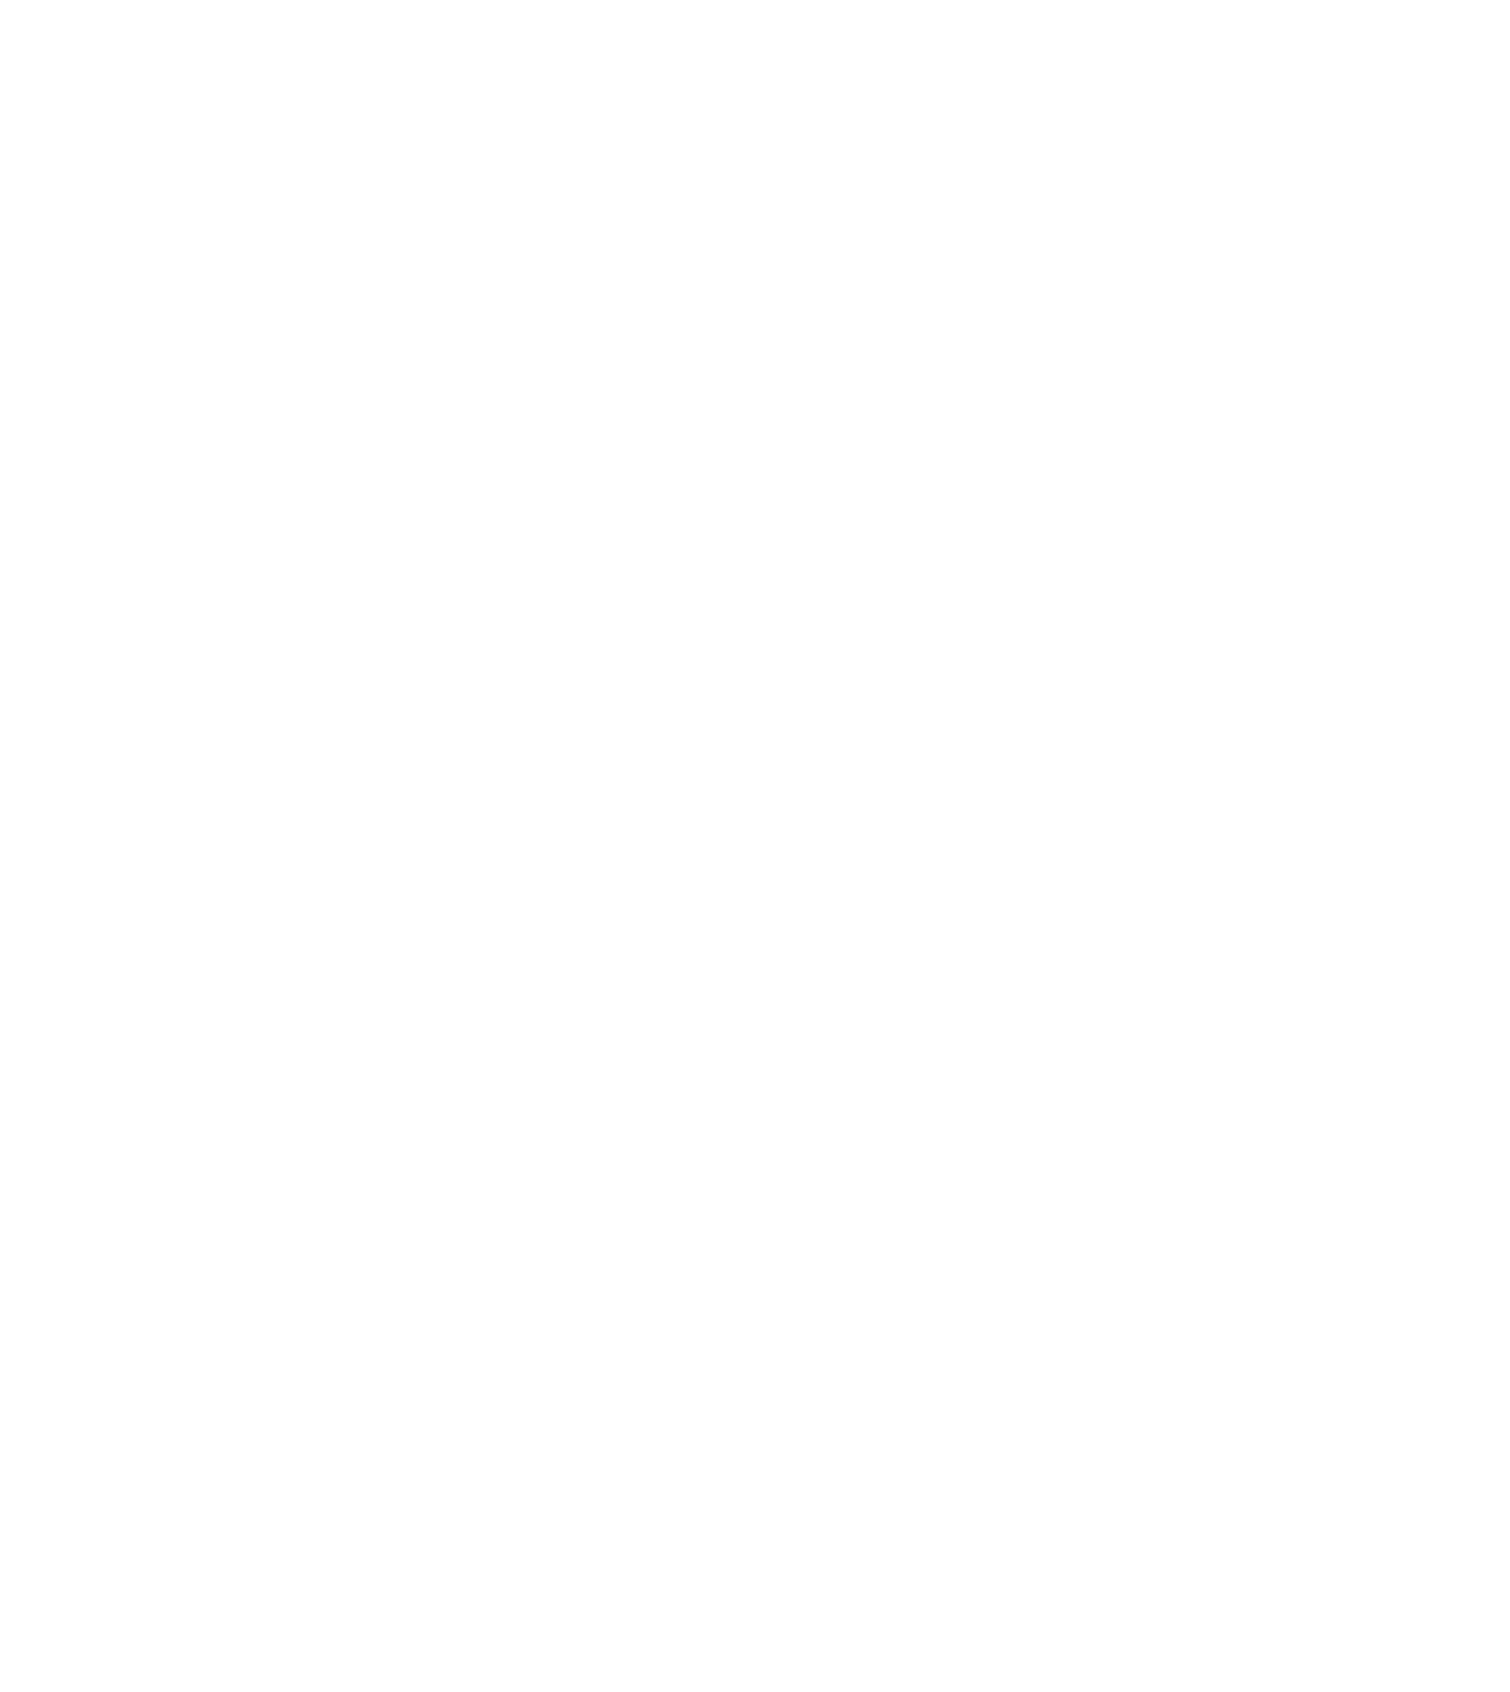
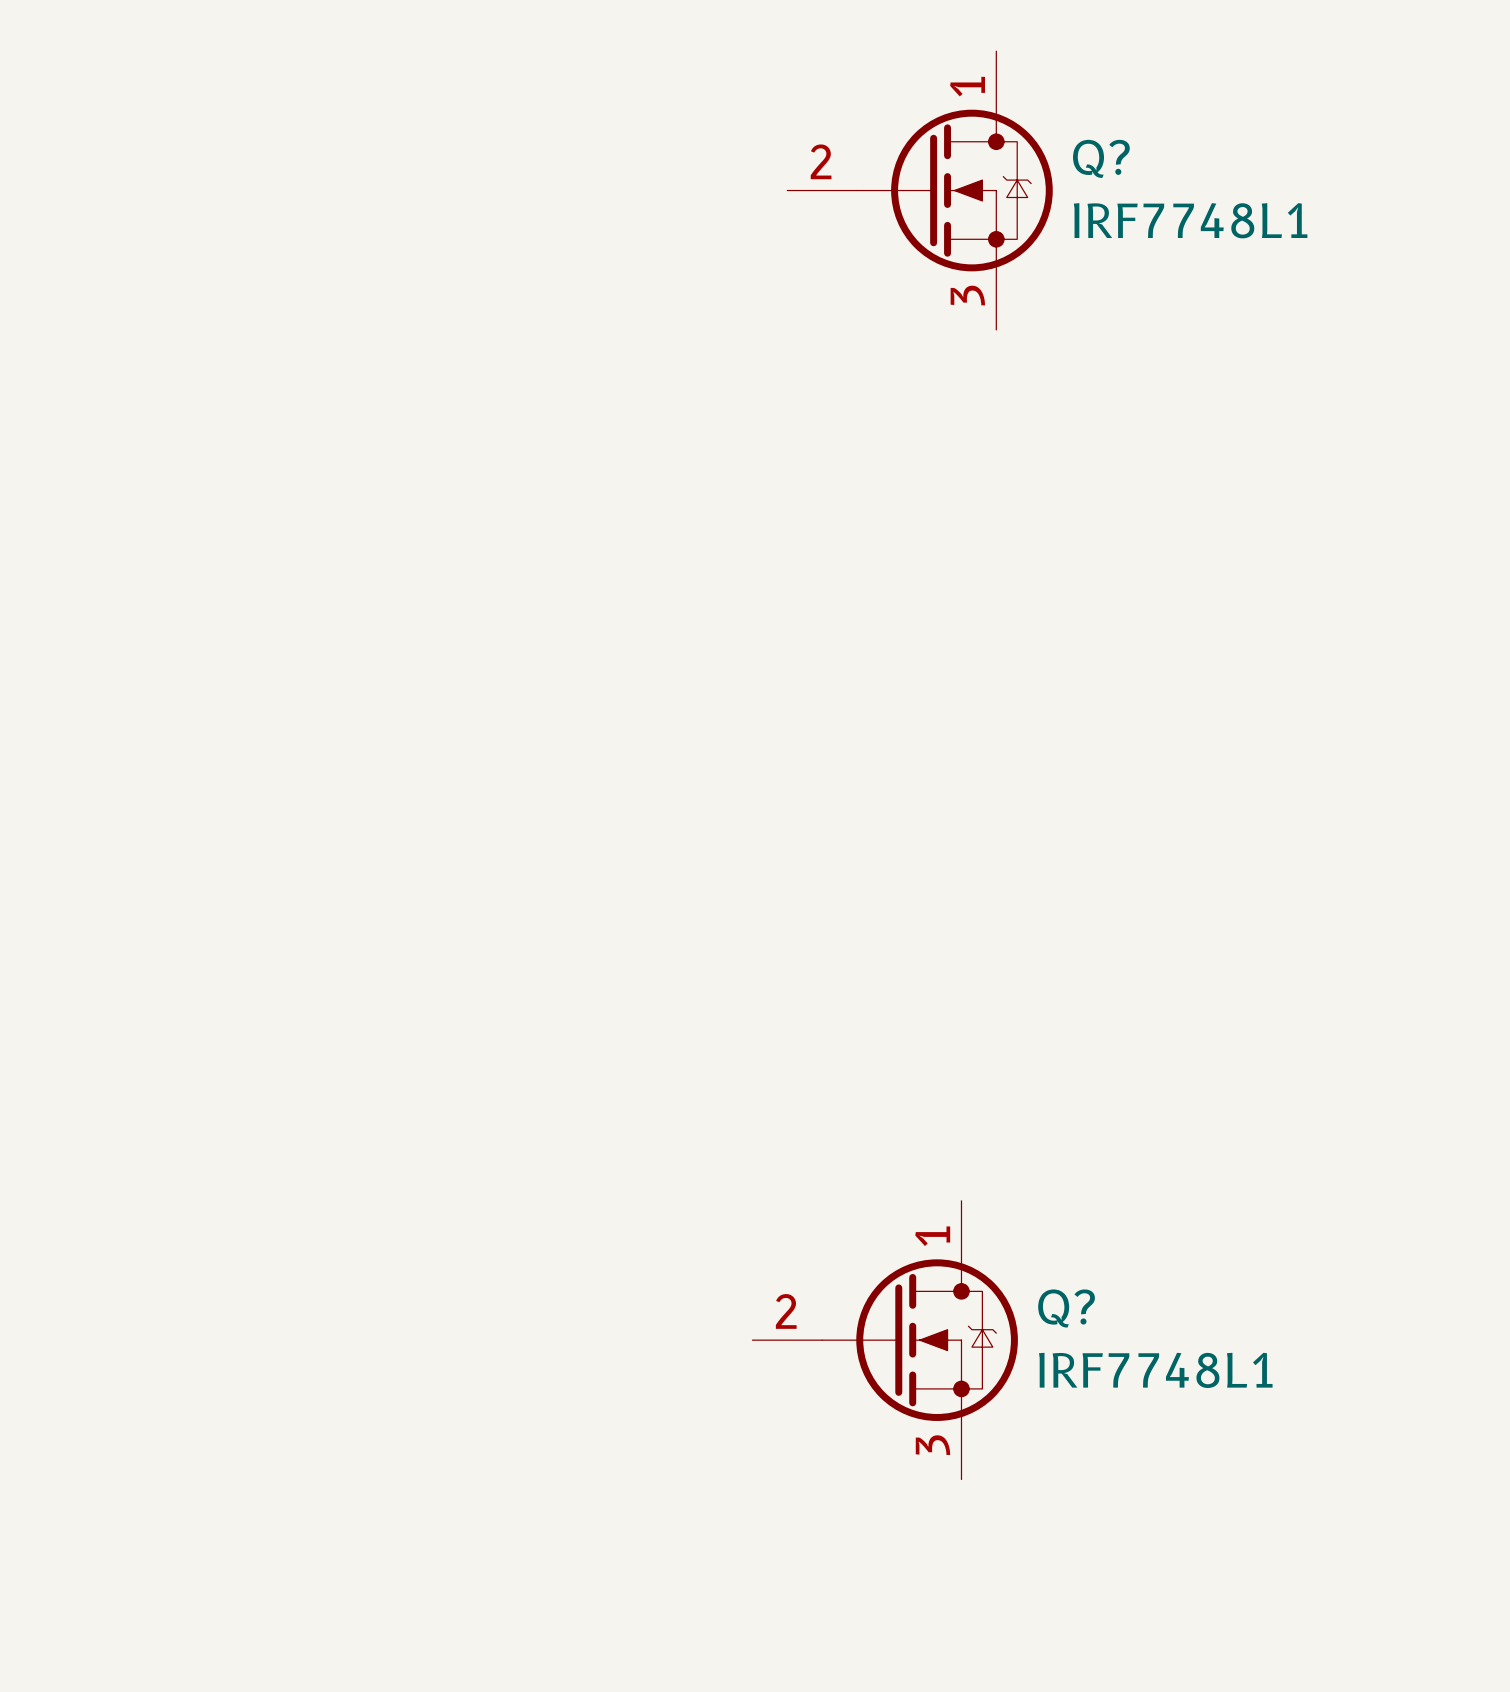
Q?: none -> IRF7748L1 (920, 190)
Q?: none -> IRF7748L1 (885, 1340)

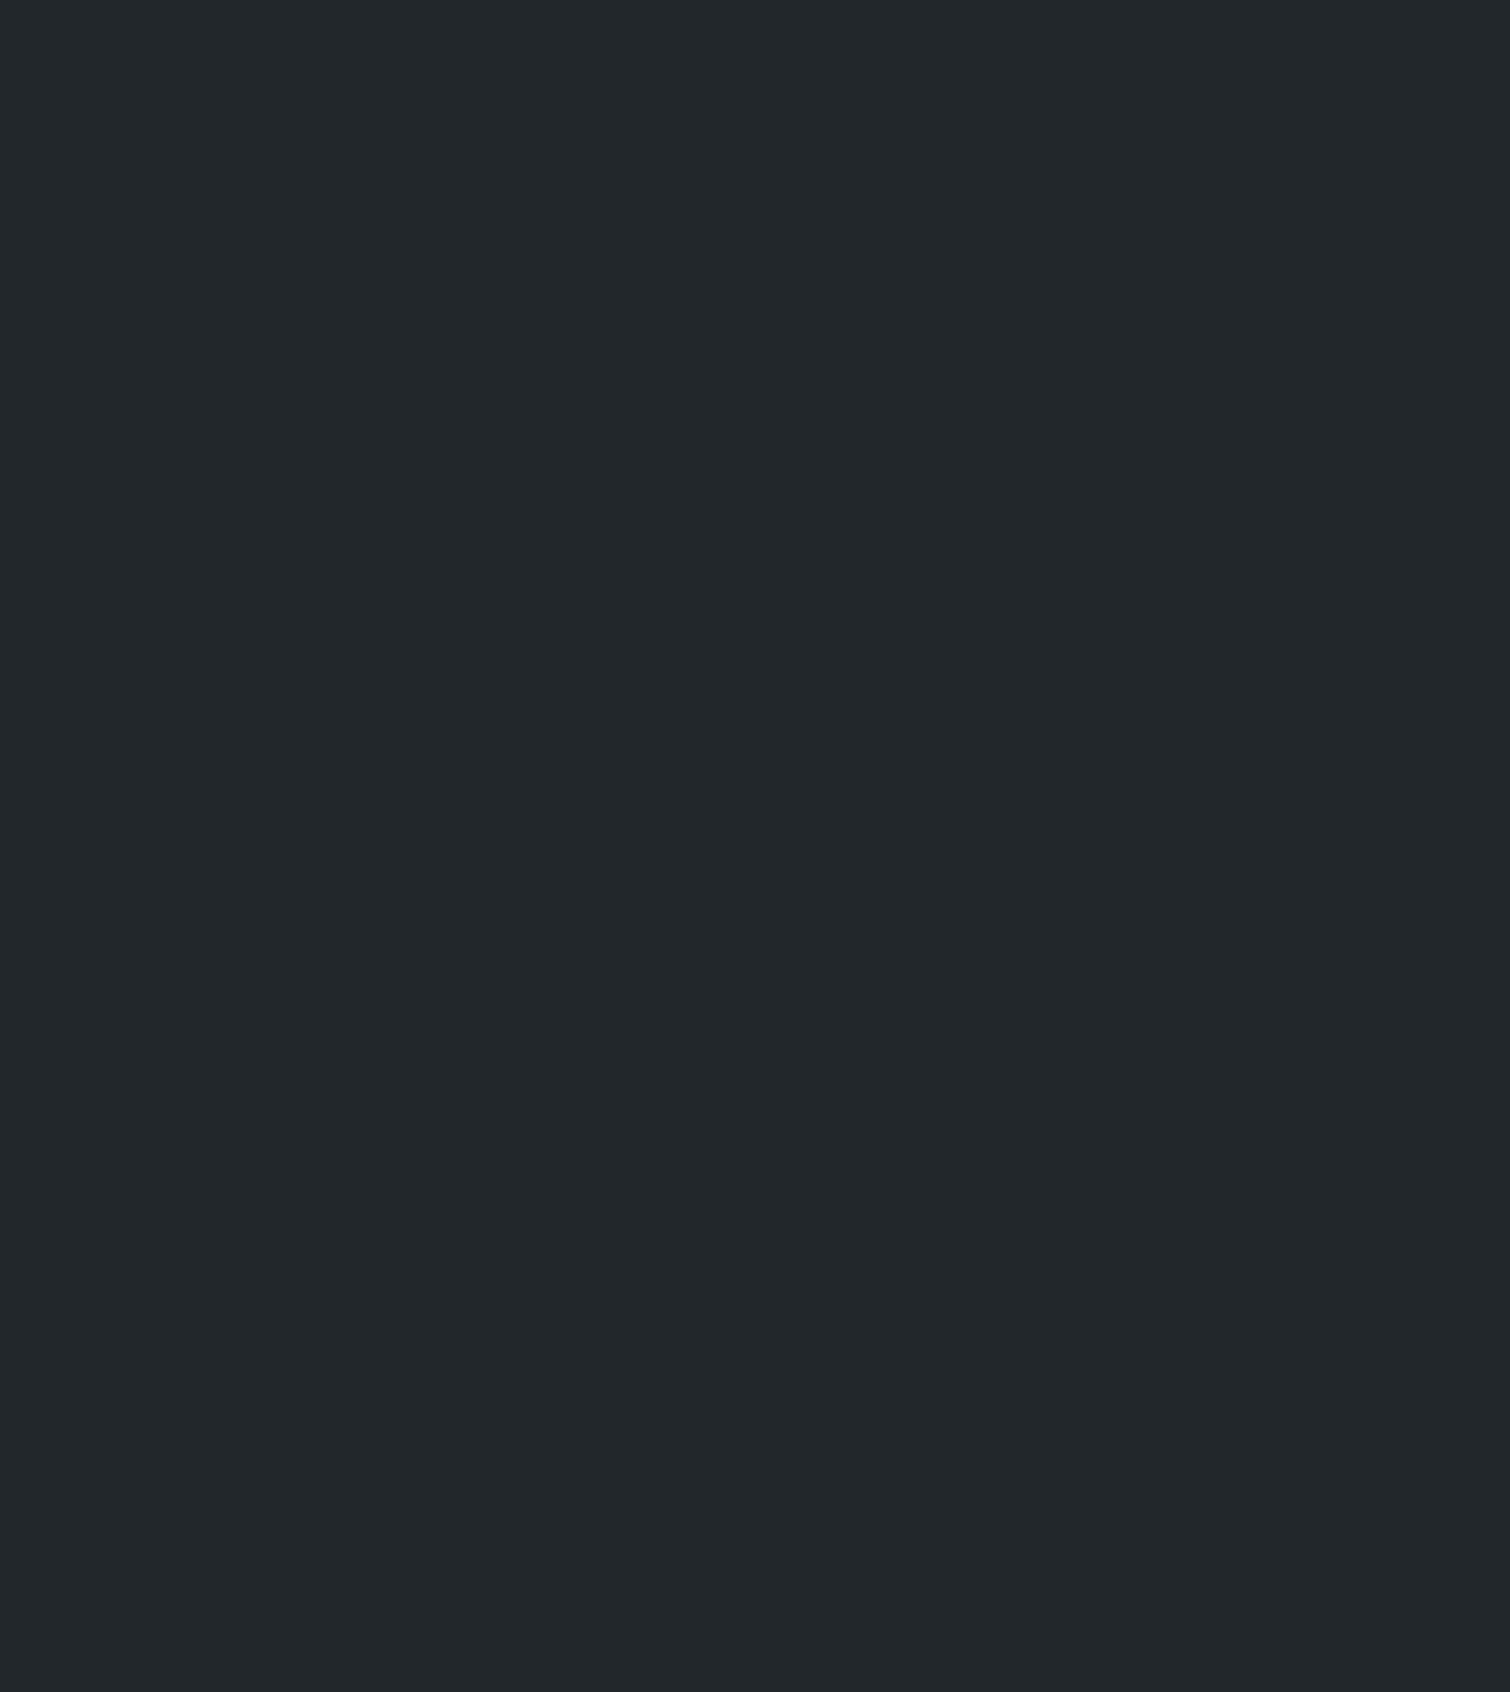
Q?: IRF7748L1 (920, 190) -> none
Q?: IRF7748L1 (885, 1340) -> none

